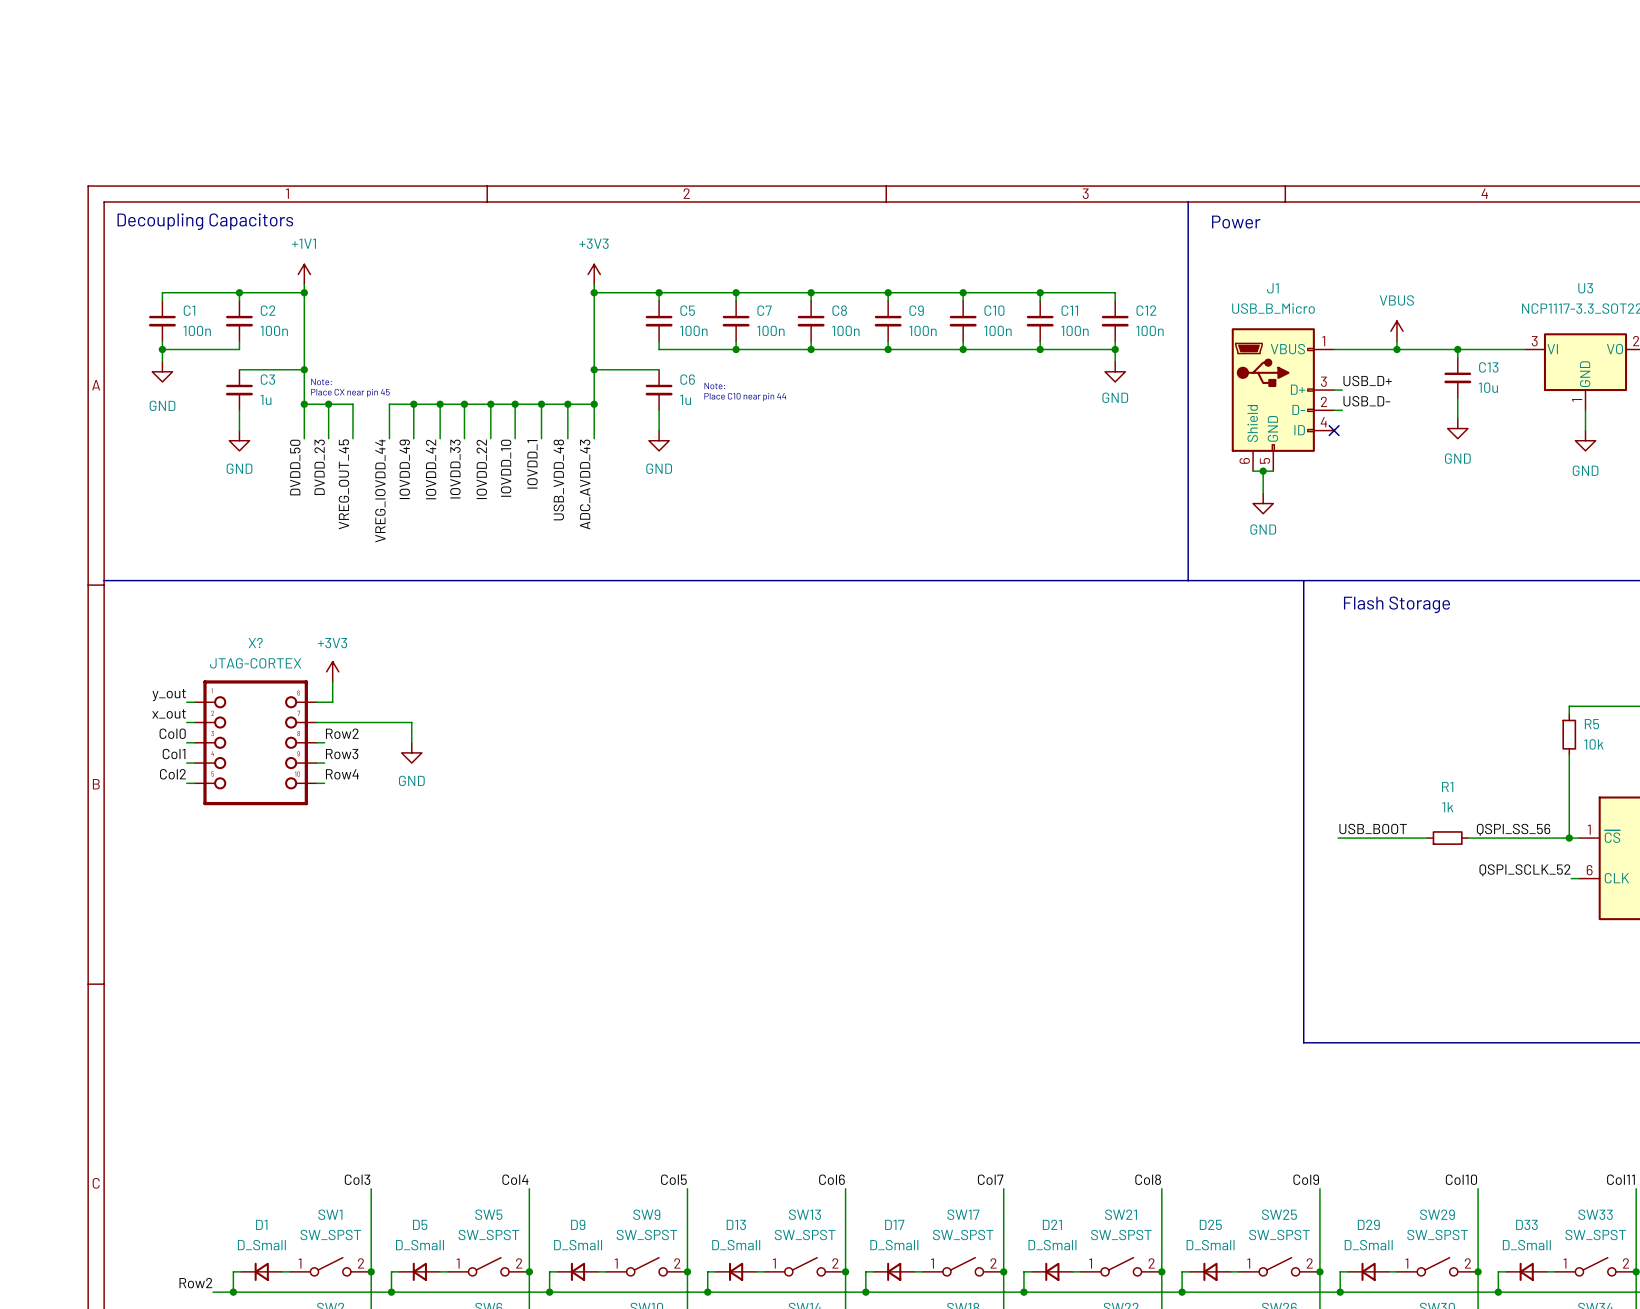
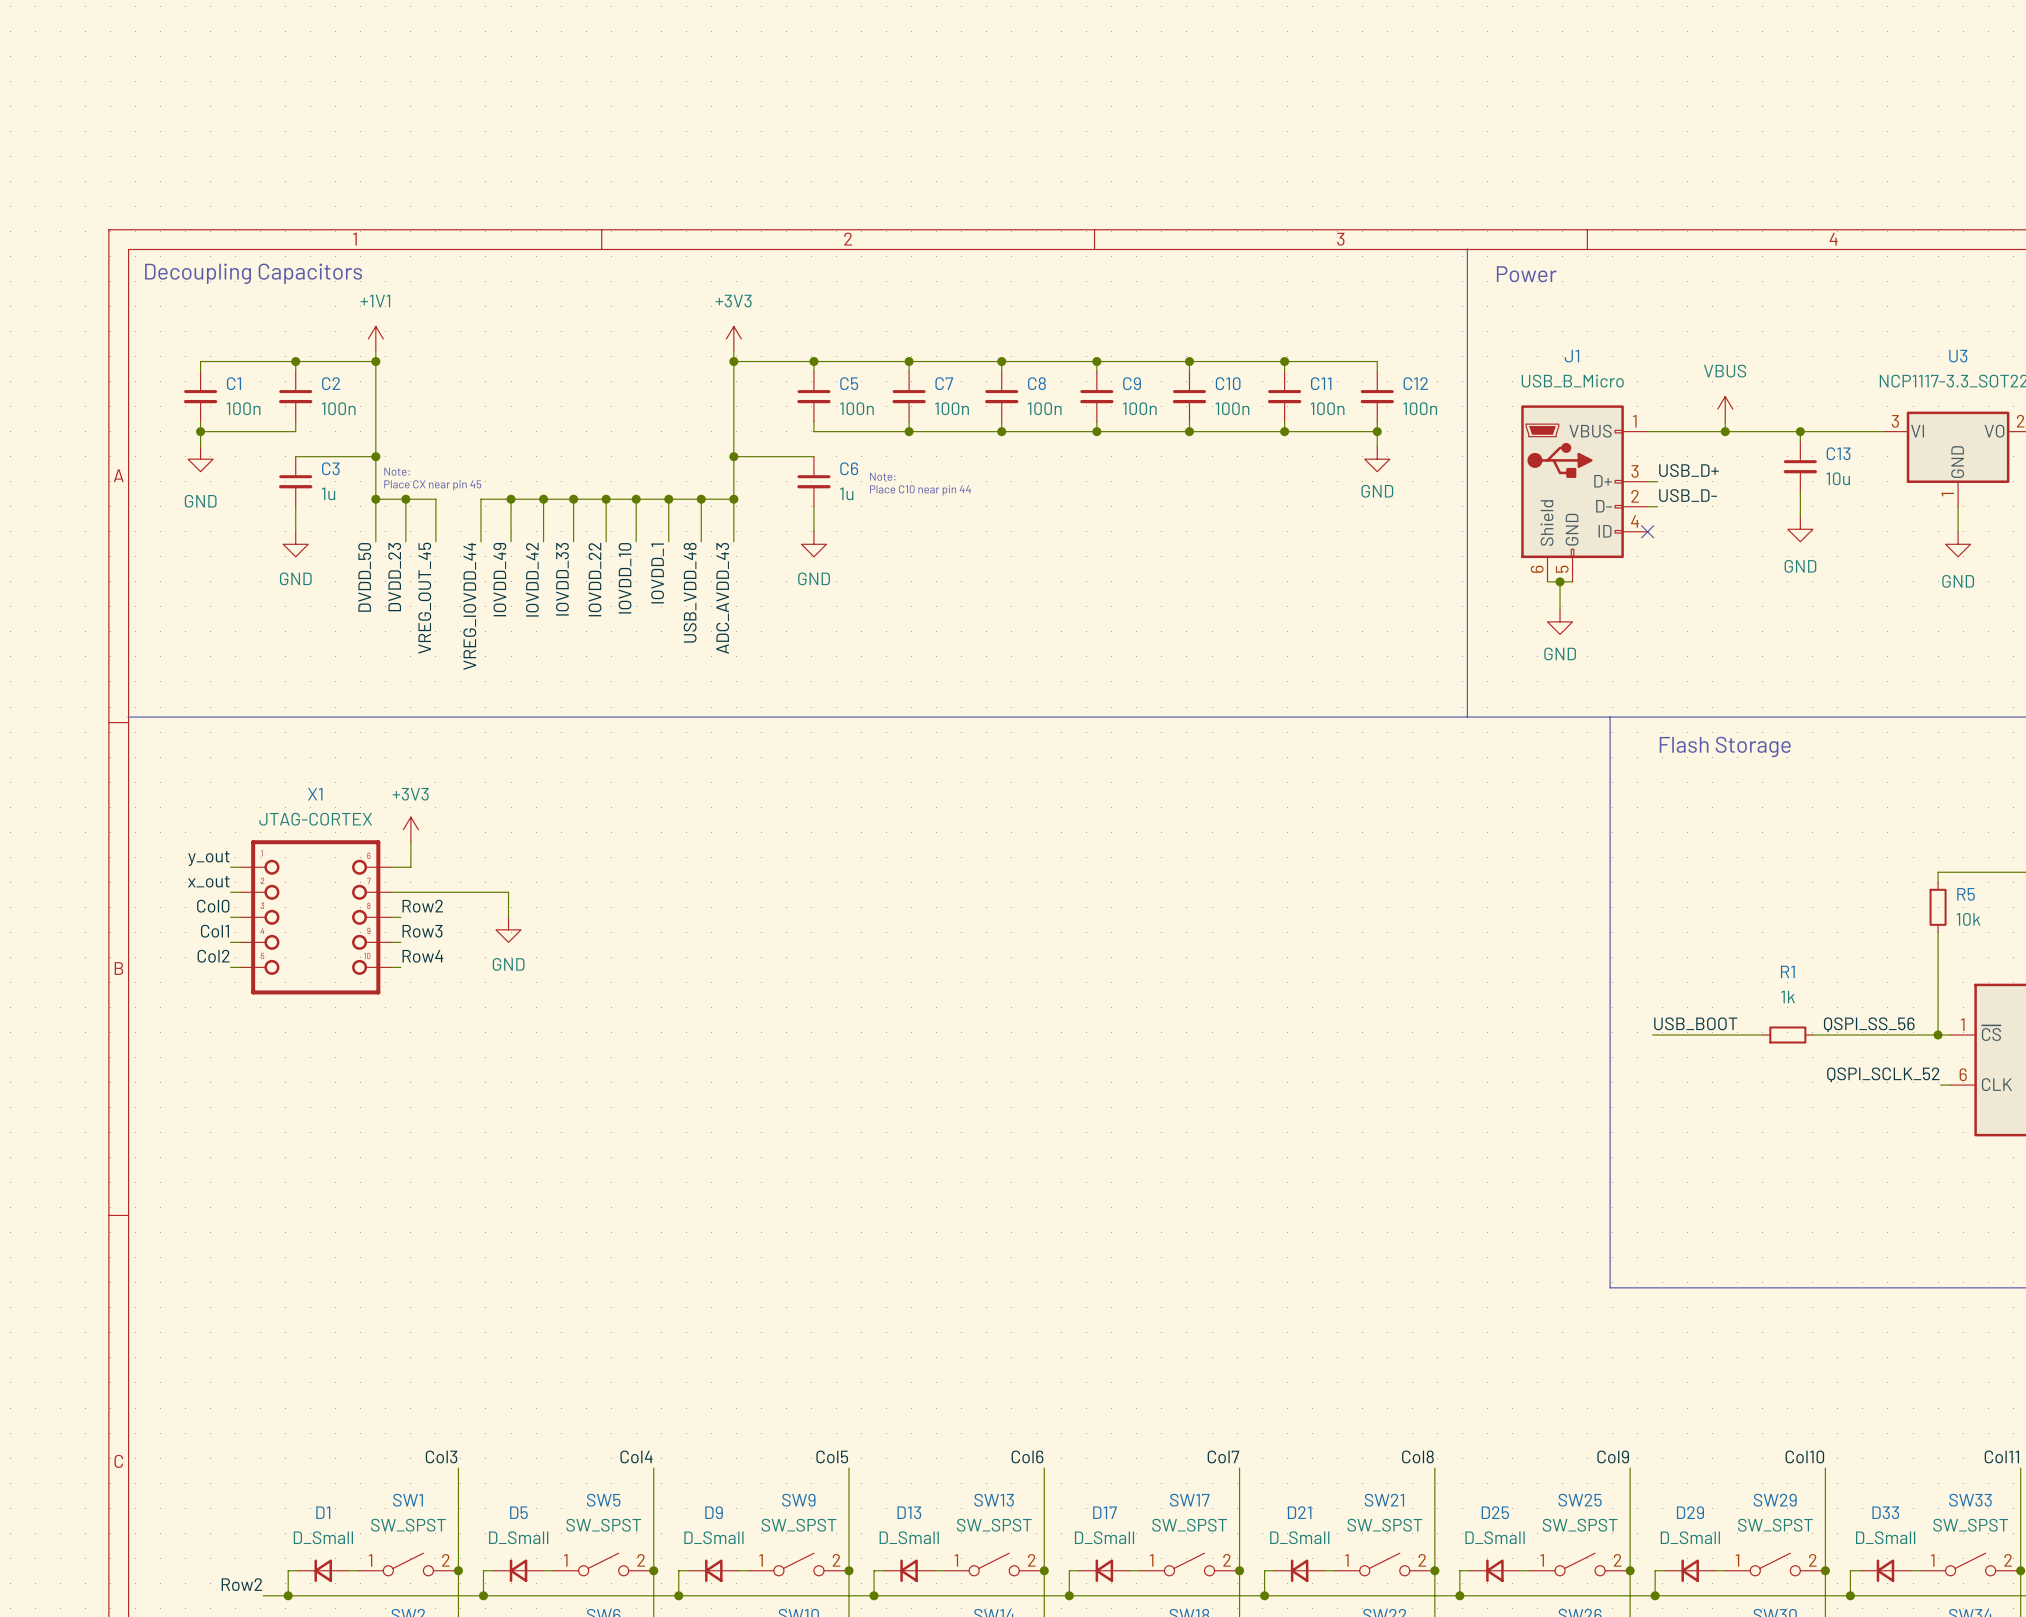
X? name: X? (255, 643) -> X1 (315, 794)

